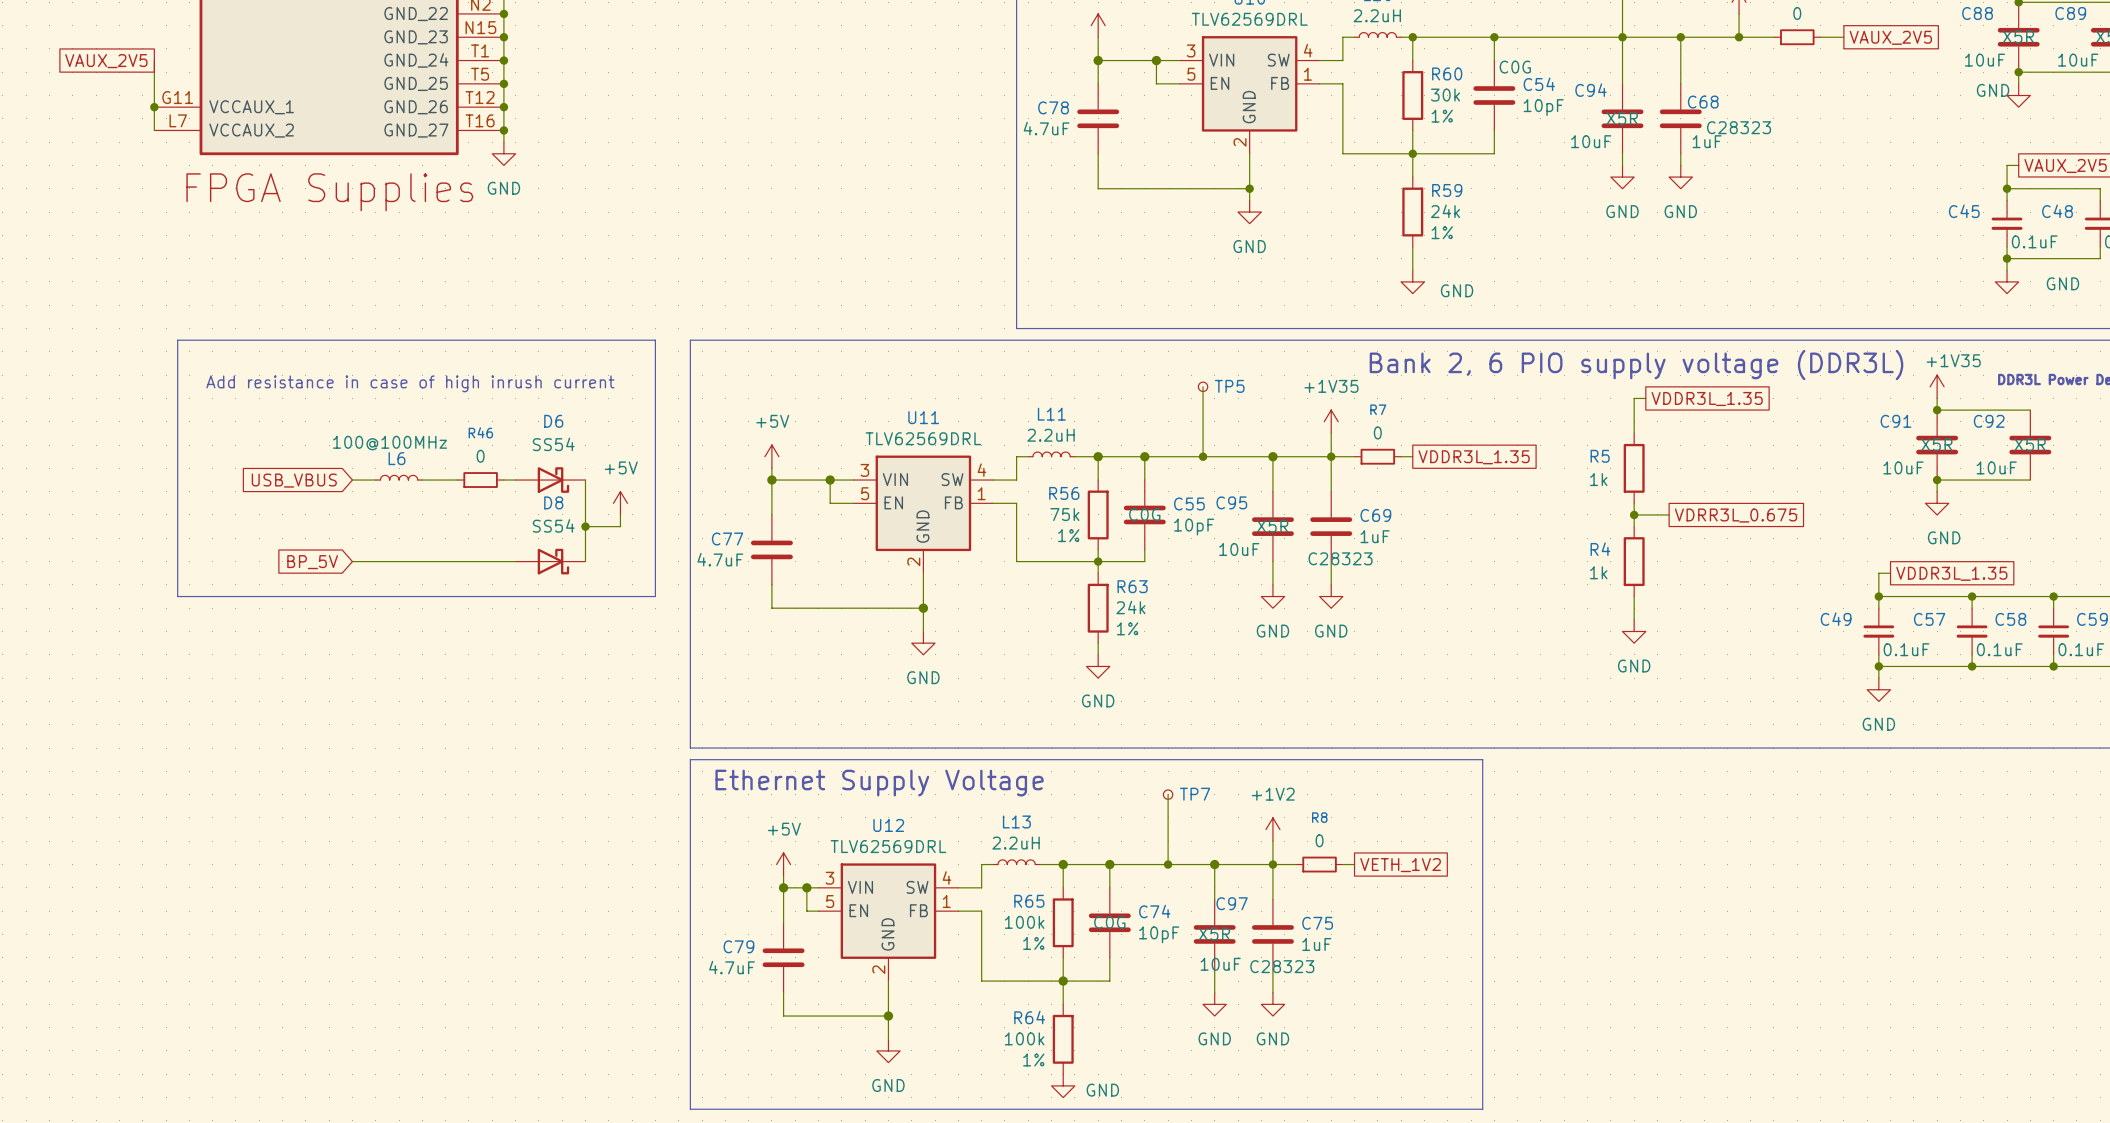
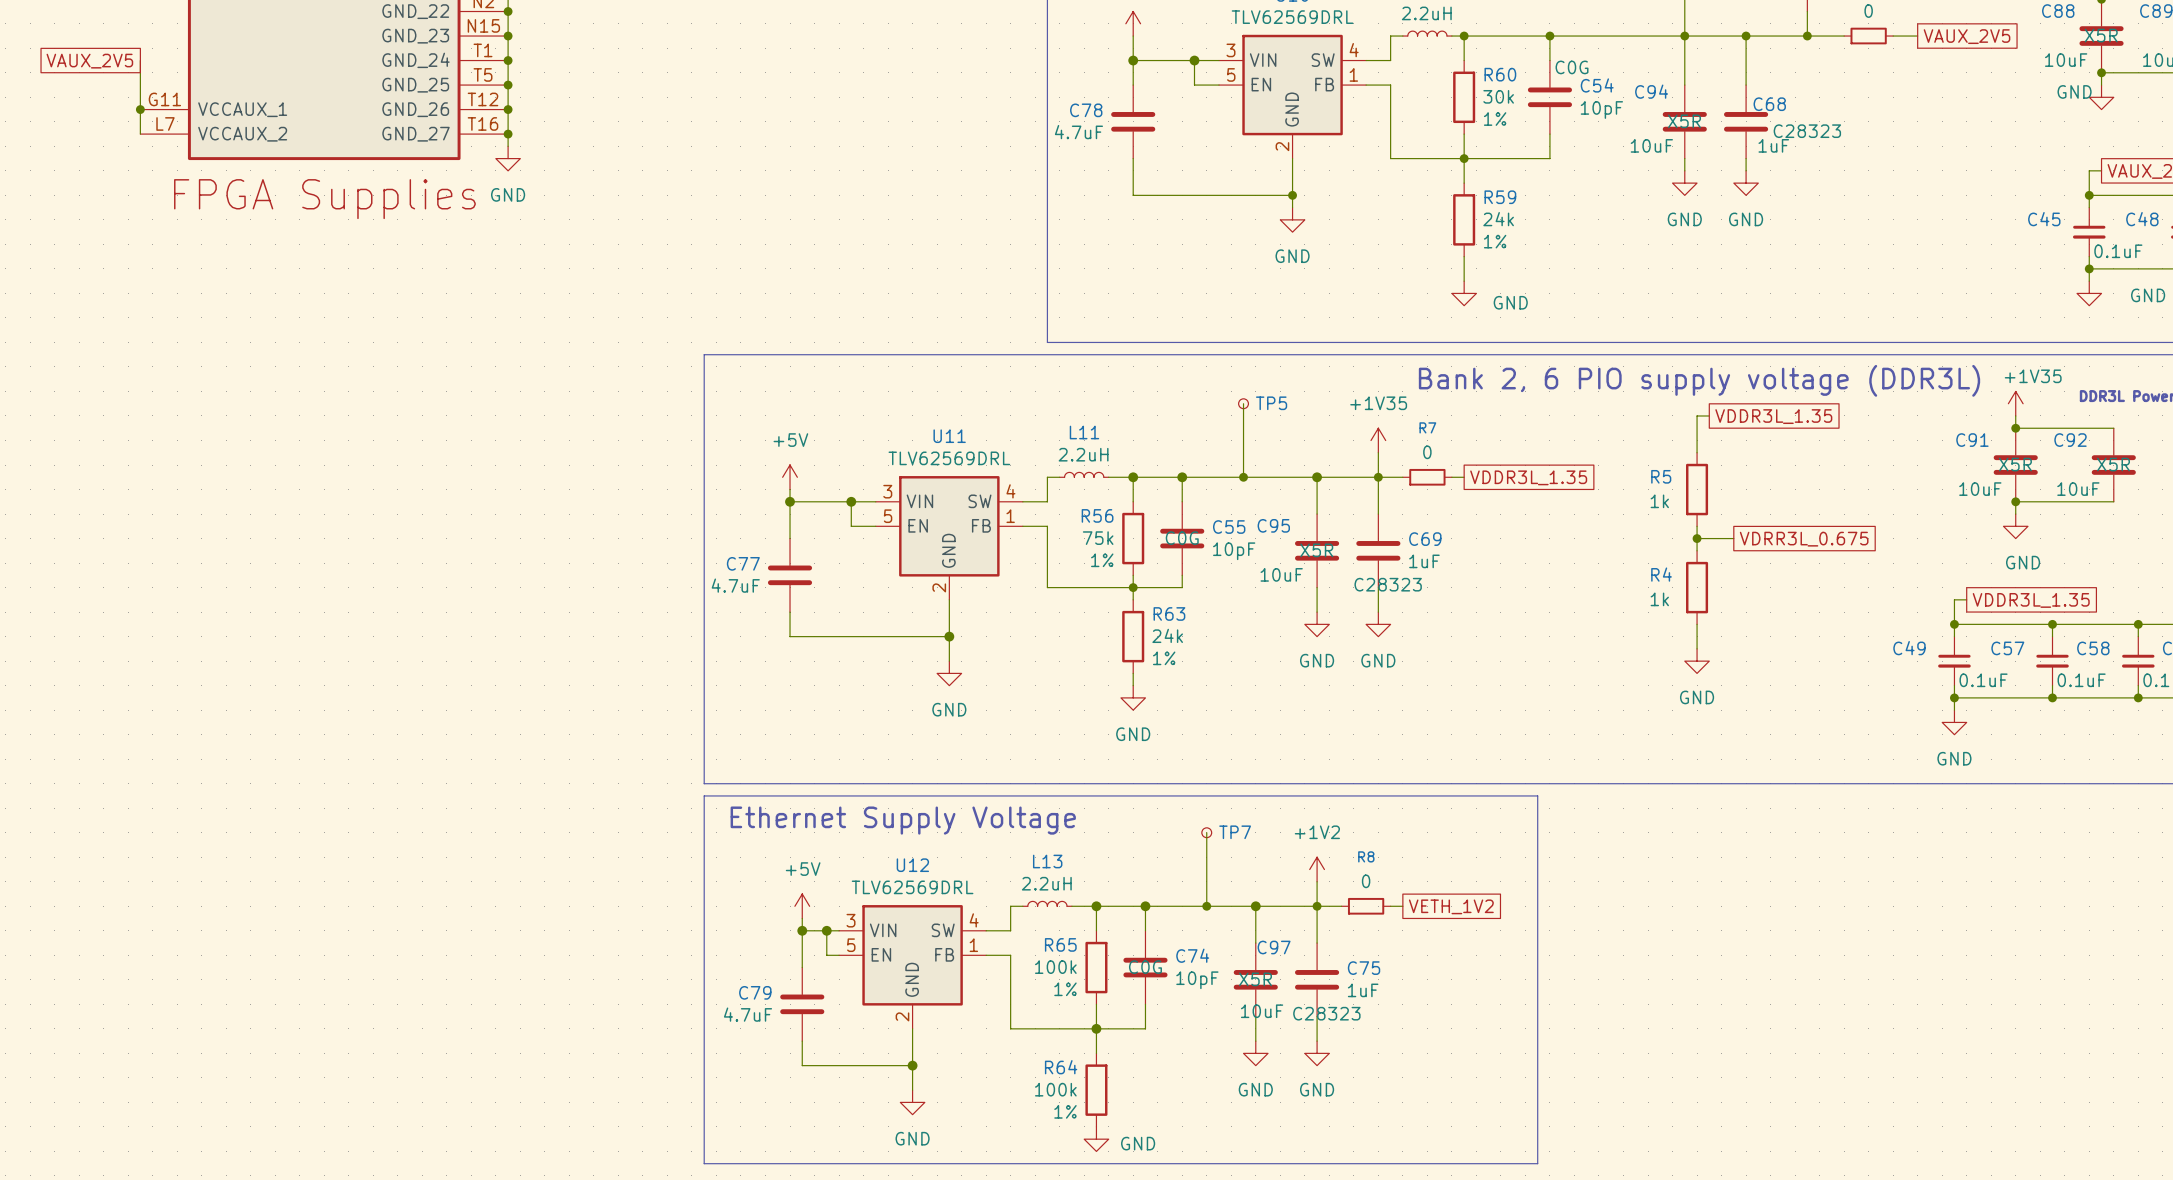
line: (177, 340) (655, 340) (655, 596) (177, 596) (177, 340) -> none
text: Add resistance in case of high inrush current (410, 383) -> none
L6: 100@100MHz (399, 477) -> none
global label: USB_VBUS (294, 480) -> none
wire: (352, 480) (375, 480) -> none
wire: (422, 480) (457, 480) -> none
R46: 0 (480, 480) -> none
wire: (503, 480) (515, 480) -> none
D6: SS54 (550, 480) -> none
wire: (585, 480) (585, 561) -> none
power symbol: +5V (620, 503) -> none
wire: (620, 514) (620, 526) (585, 526) -> none
junction: (585, 526) -> none
wire: (352, 561) (515, 561) -> none
D8: SS54 (550, 561) -> none
global label: BP_5V (312, 562) -> none

